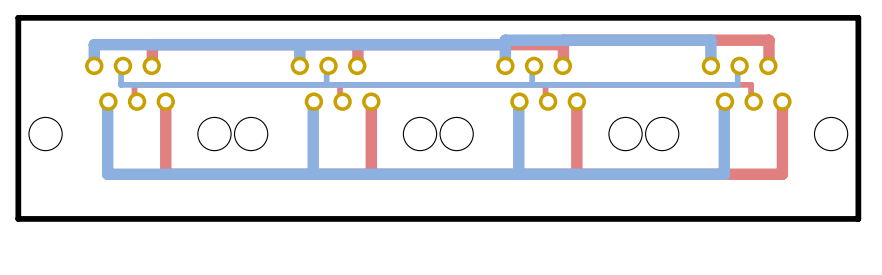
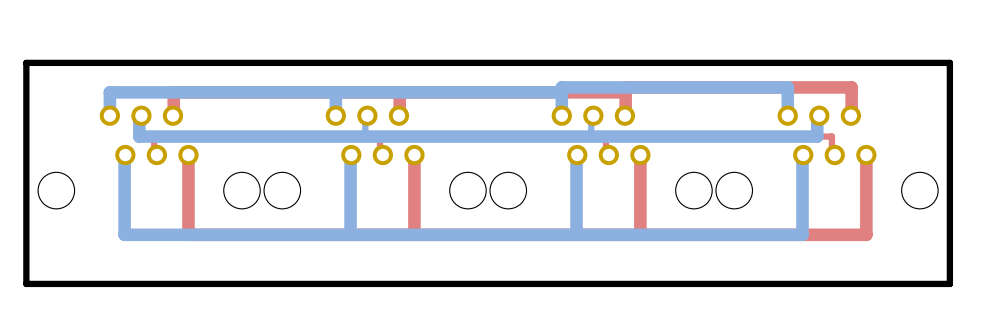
bottom track width: thin (737, 67) (737, 84) (121, 84) (121, 67) -> thick (817, 116) (817, 136) (139, 136) (139, 116)

